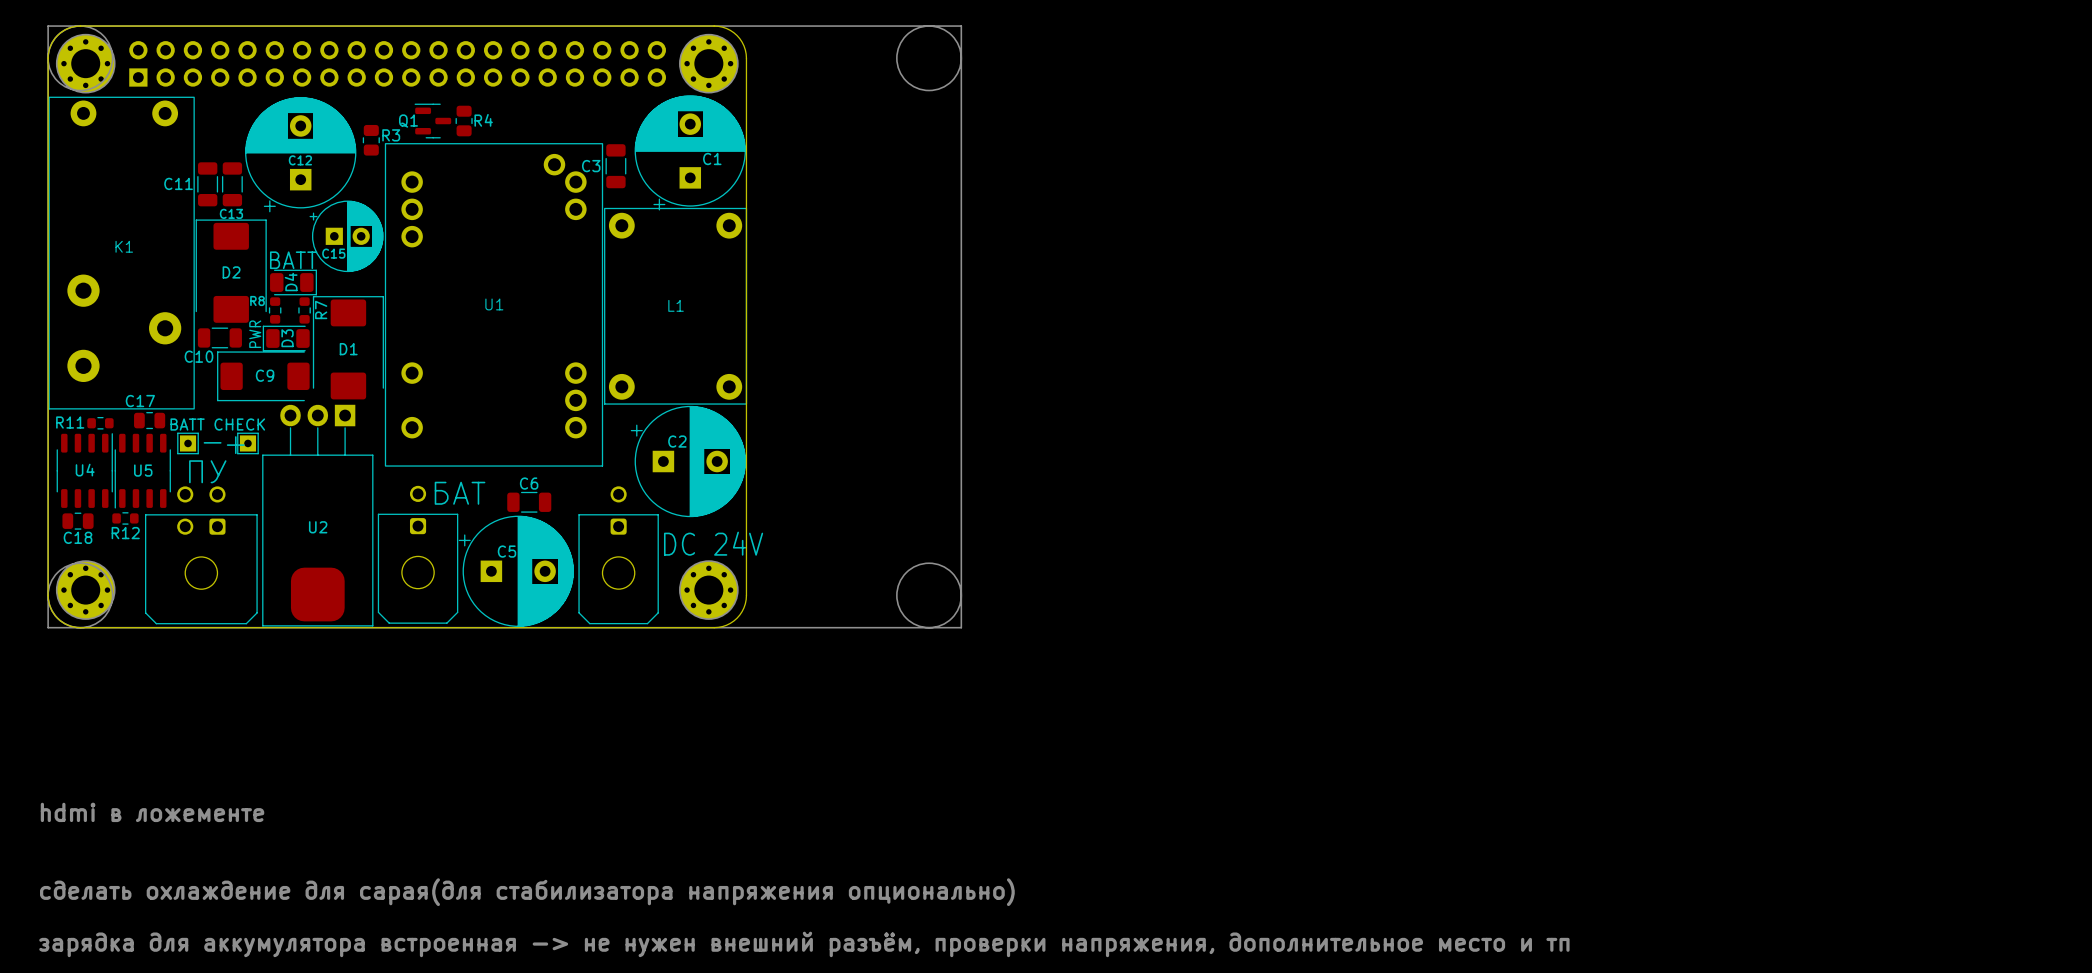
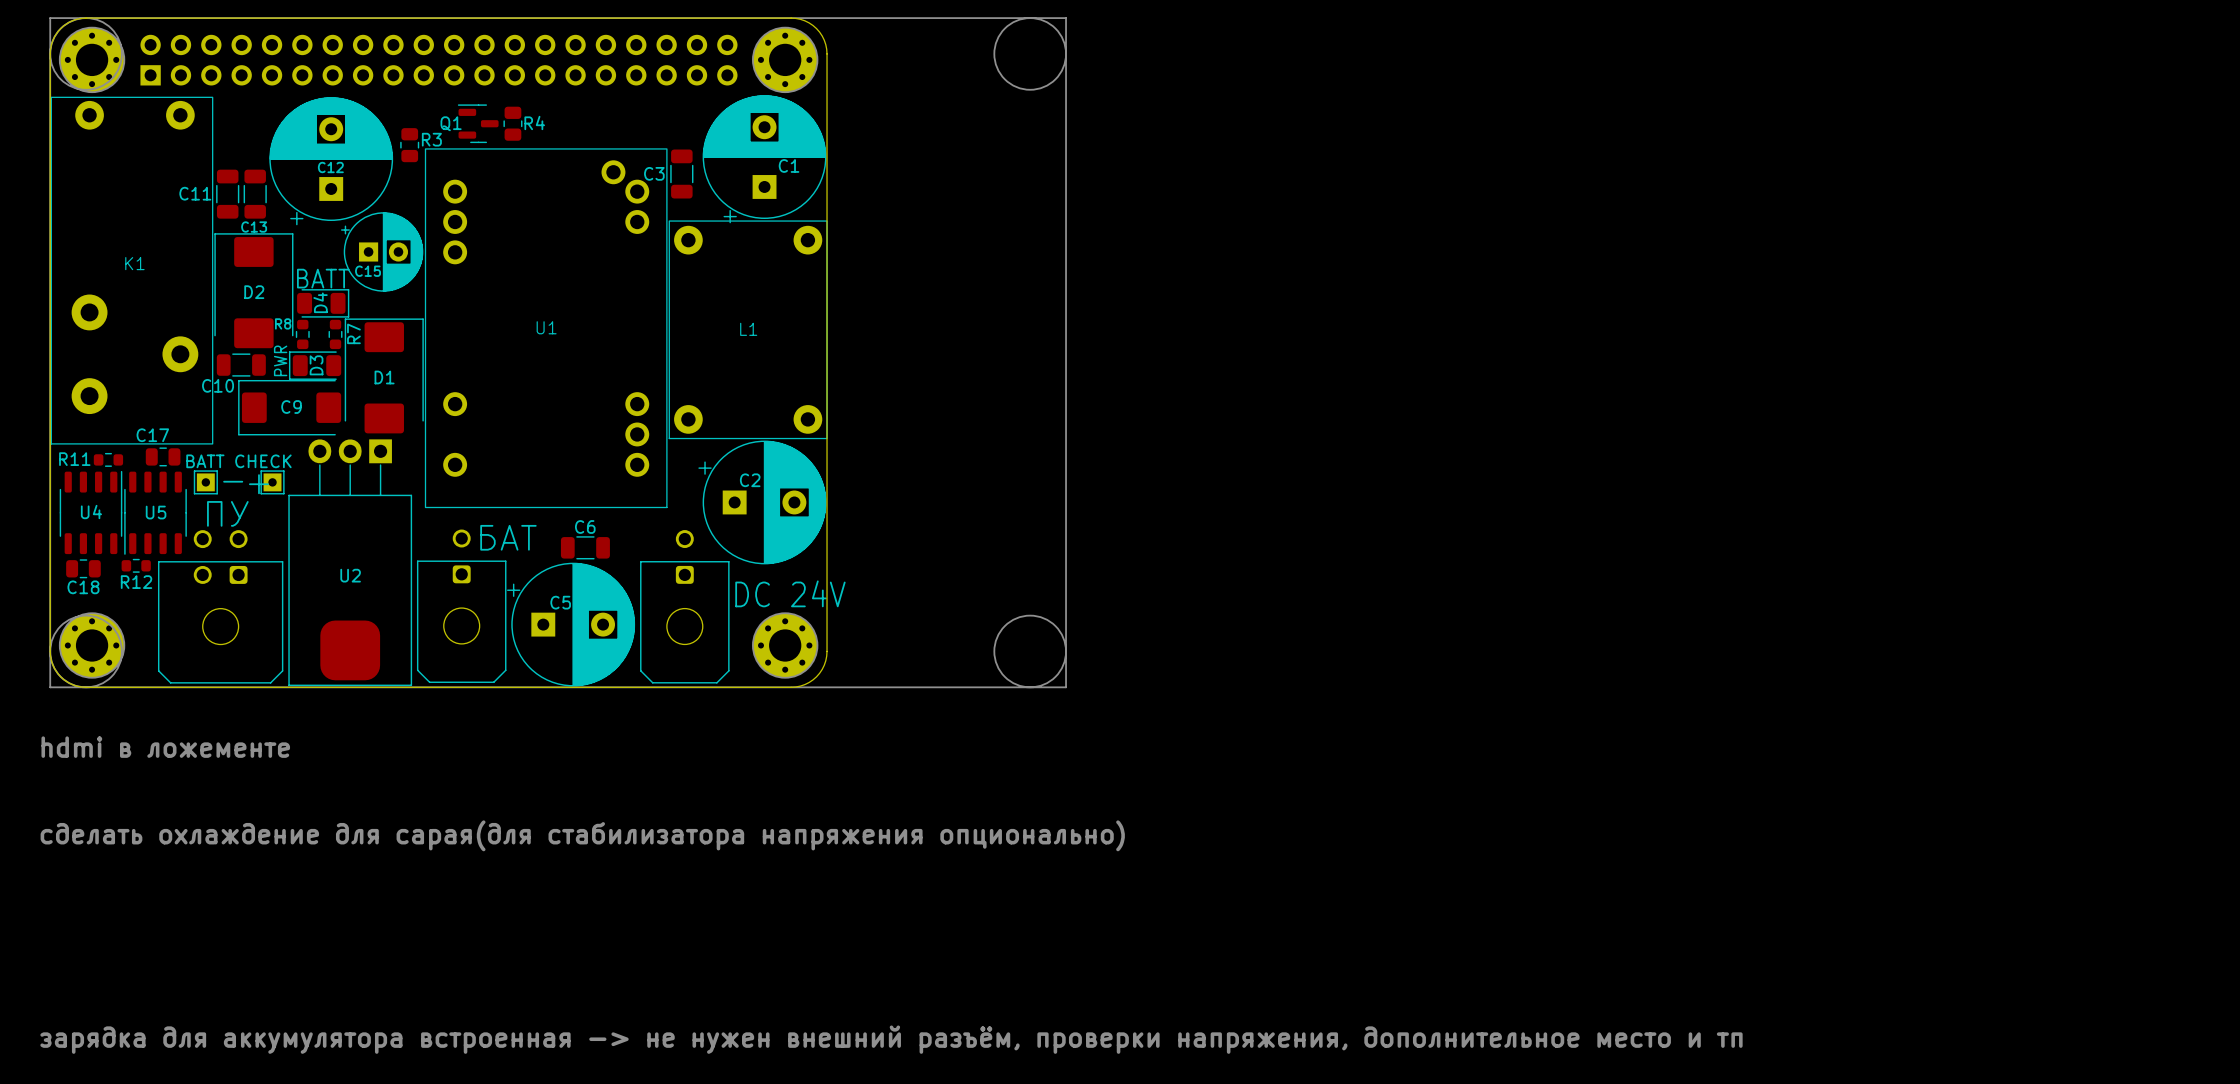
text position: hdmi в ложементе (152, 812) -> hdmi в ложементе (165, 747)
text position: сделать охлаждение для сарая(для стабилизатора напряжения опционально) (527, 892) -> сделать охлаждение для сарая(для стабилизатора напряжения опционально) (582, 835)

